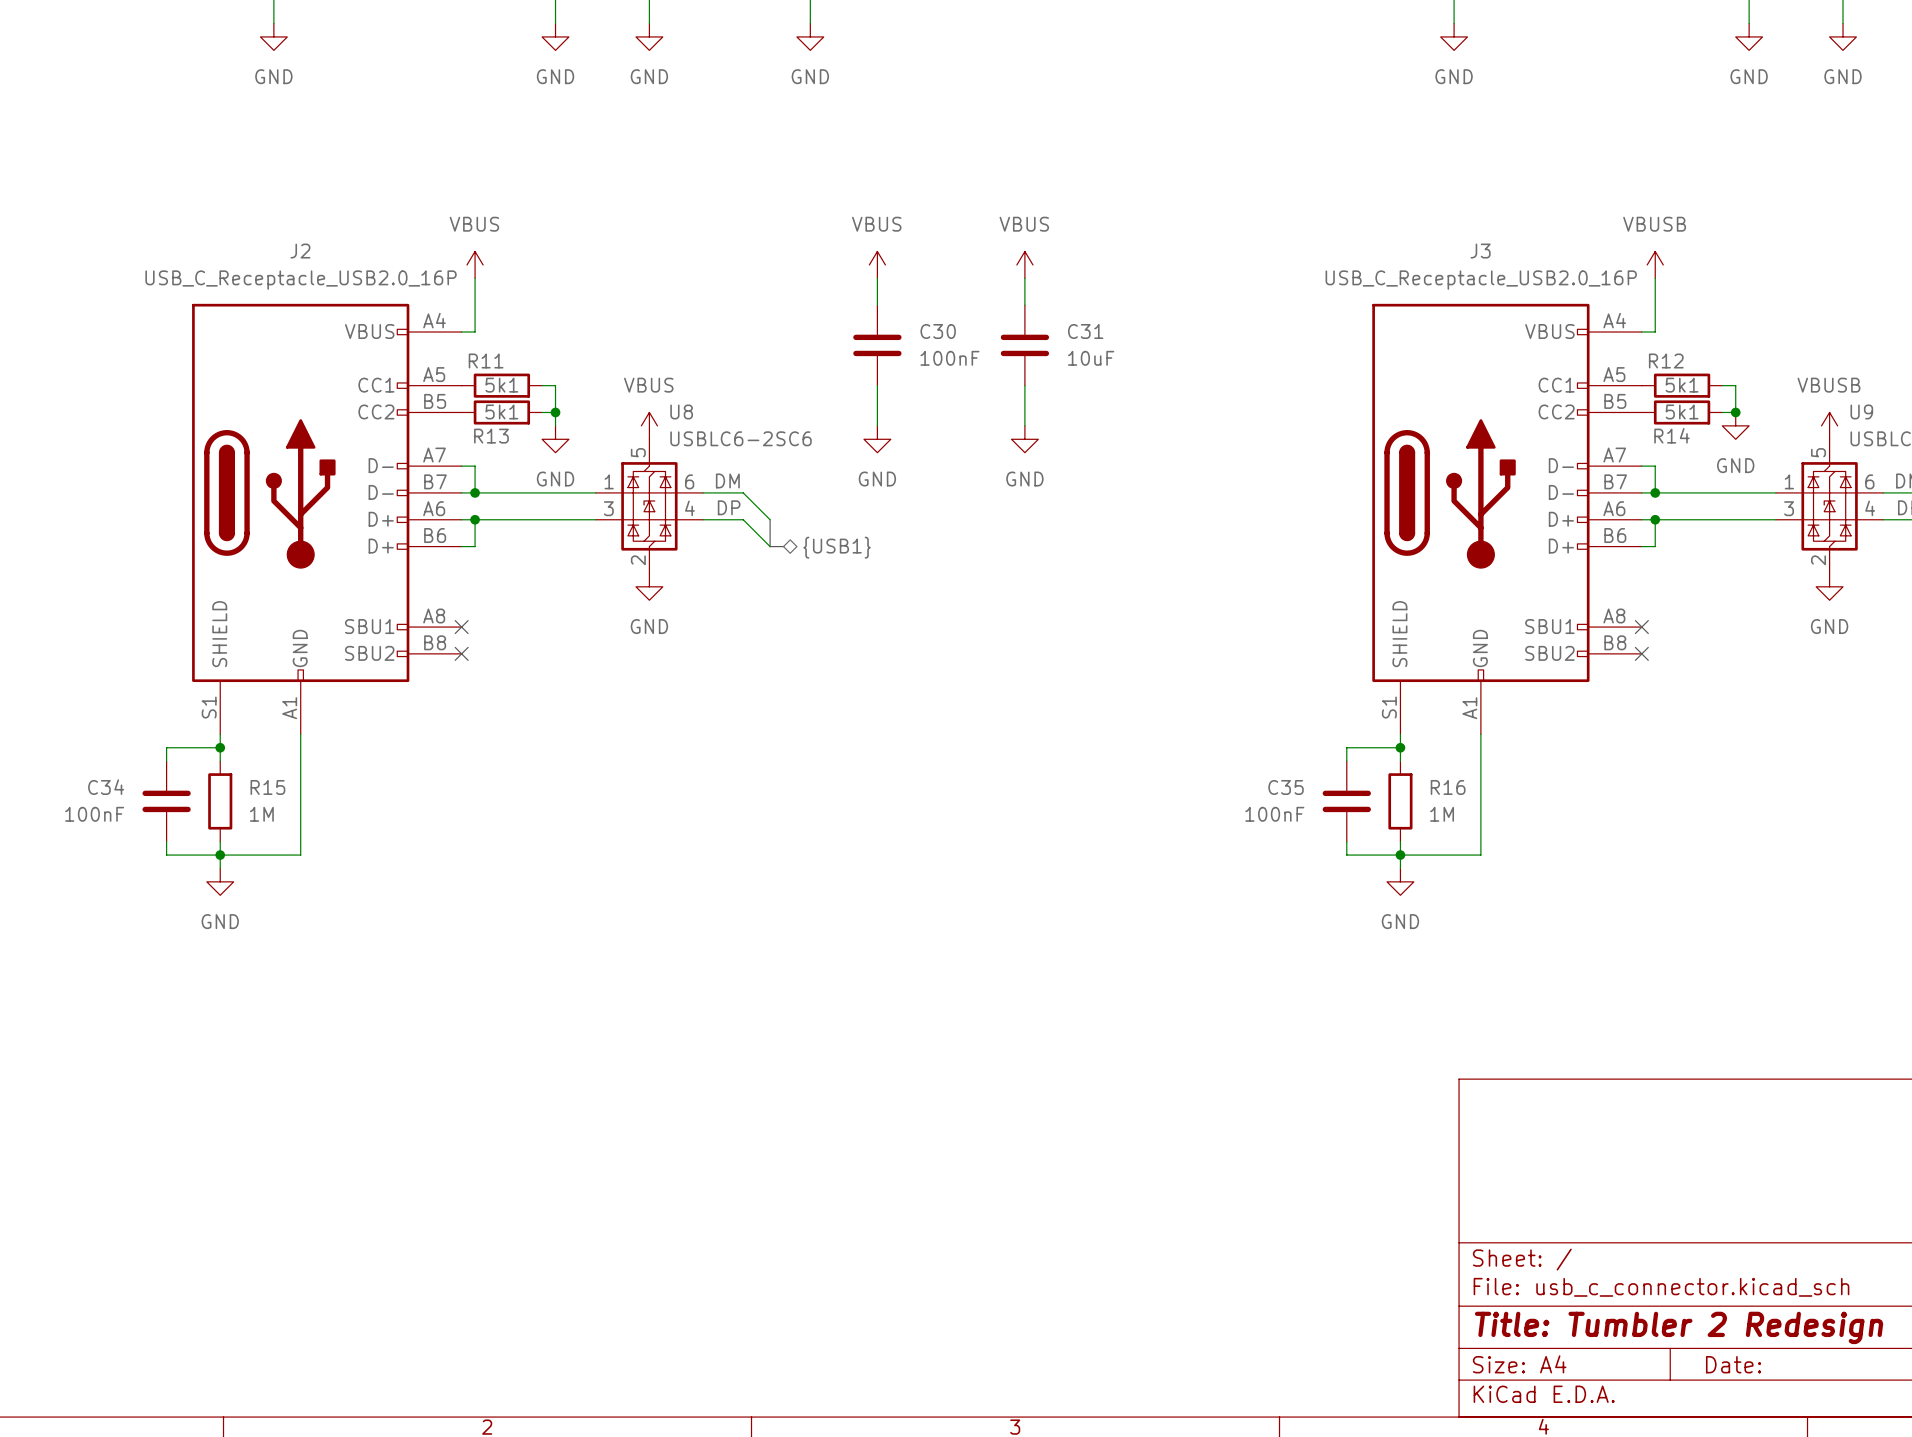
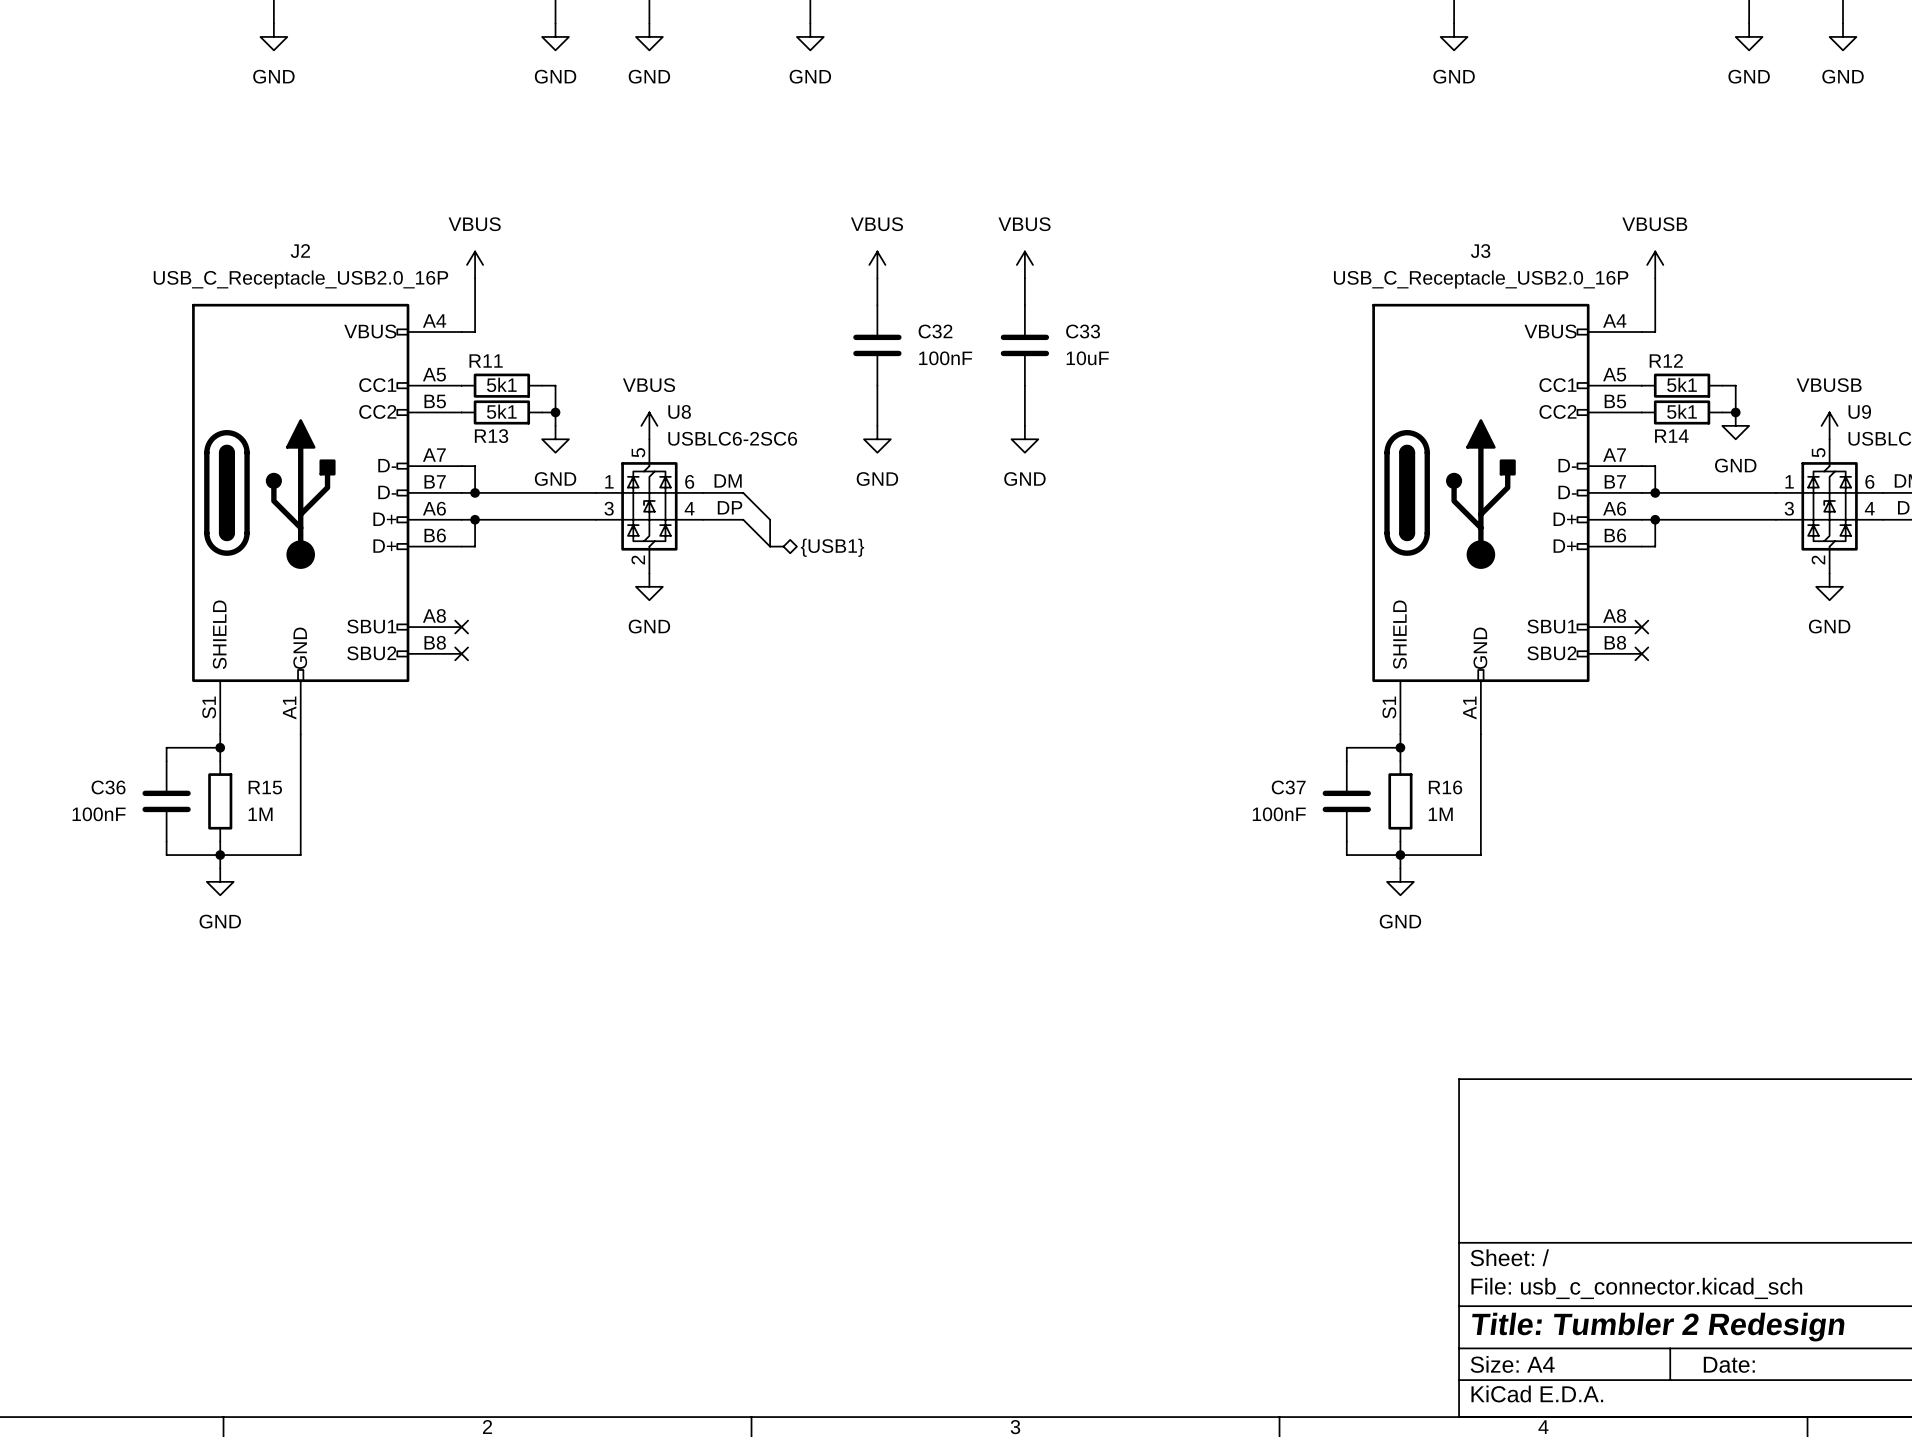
C30 name: C30 (938, 331) -> C32 (935, 331)
C31 name: C31 (1085, 331) -> C33 (1083, 331)
C34 name: C34 (106, 787) -> C36 (108, 787)
C35 name: C35 (1286, 787) -> C37 (1288, 787)

